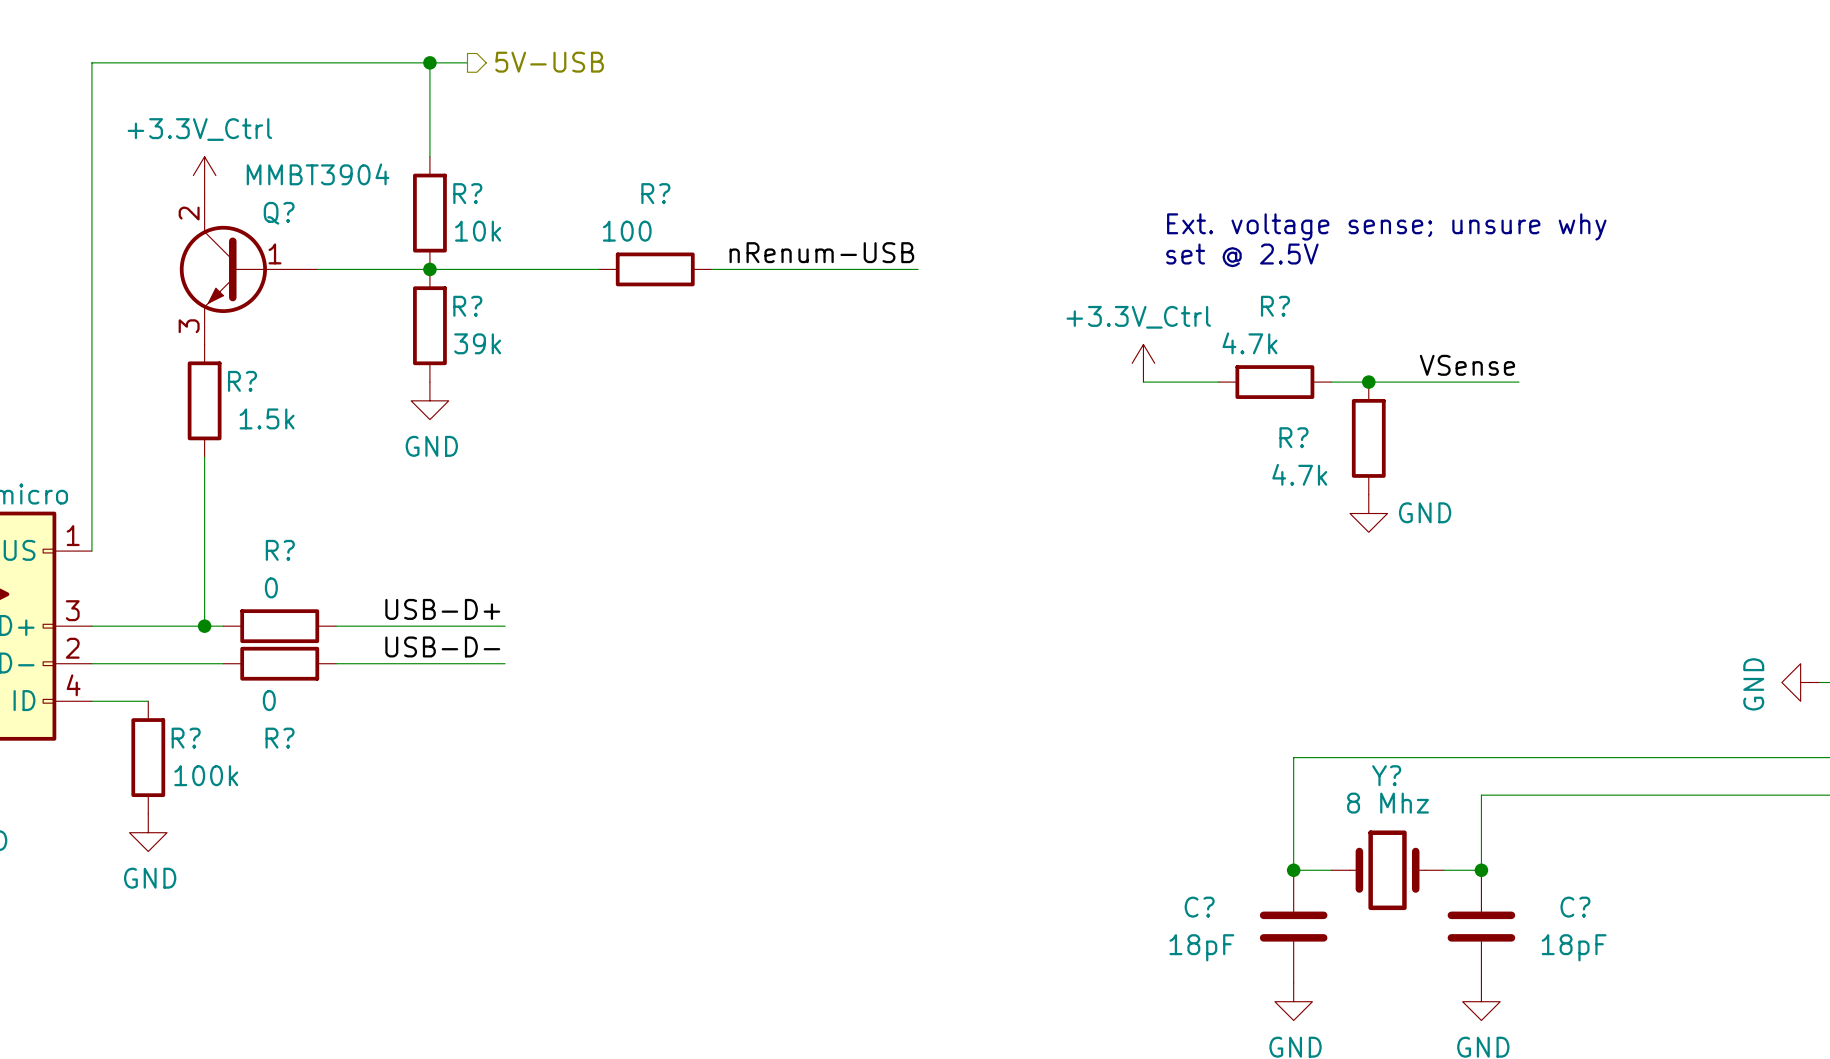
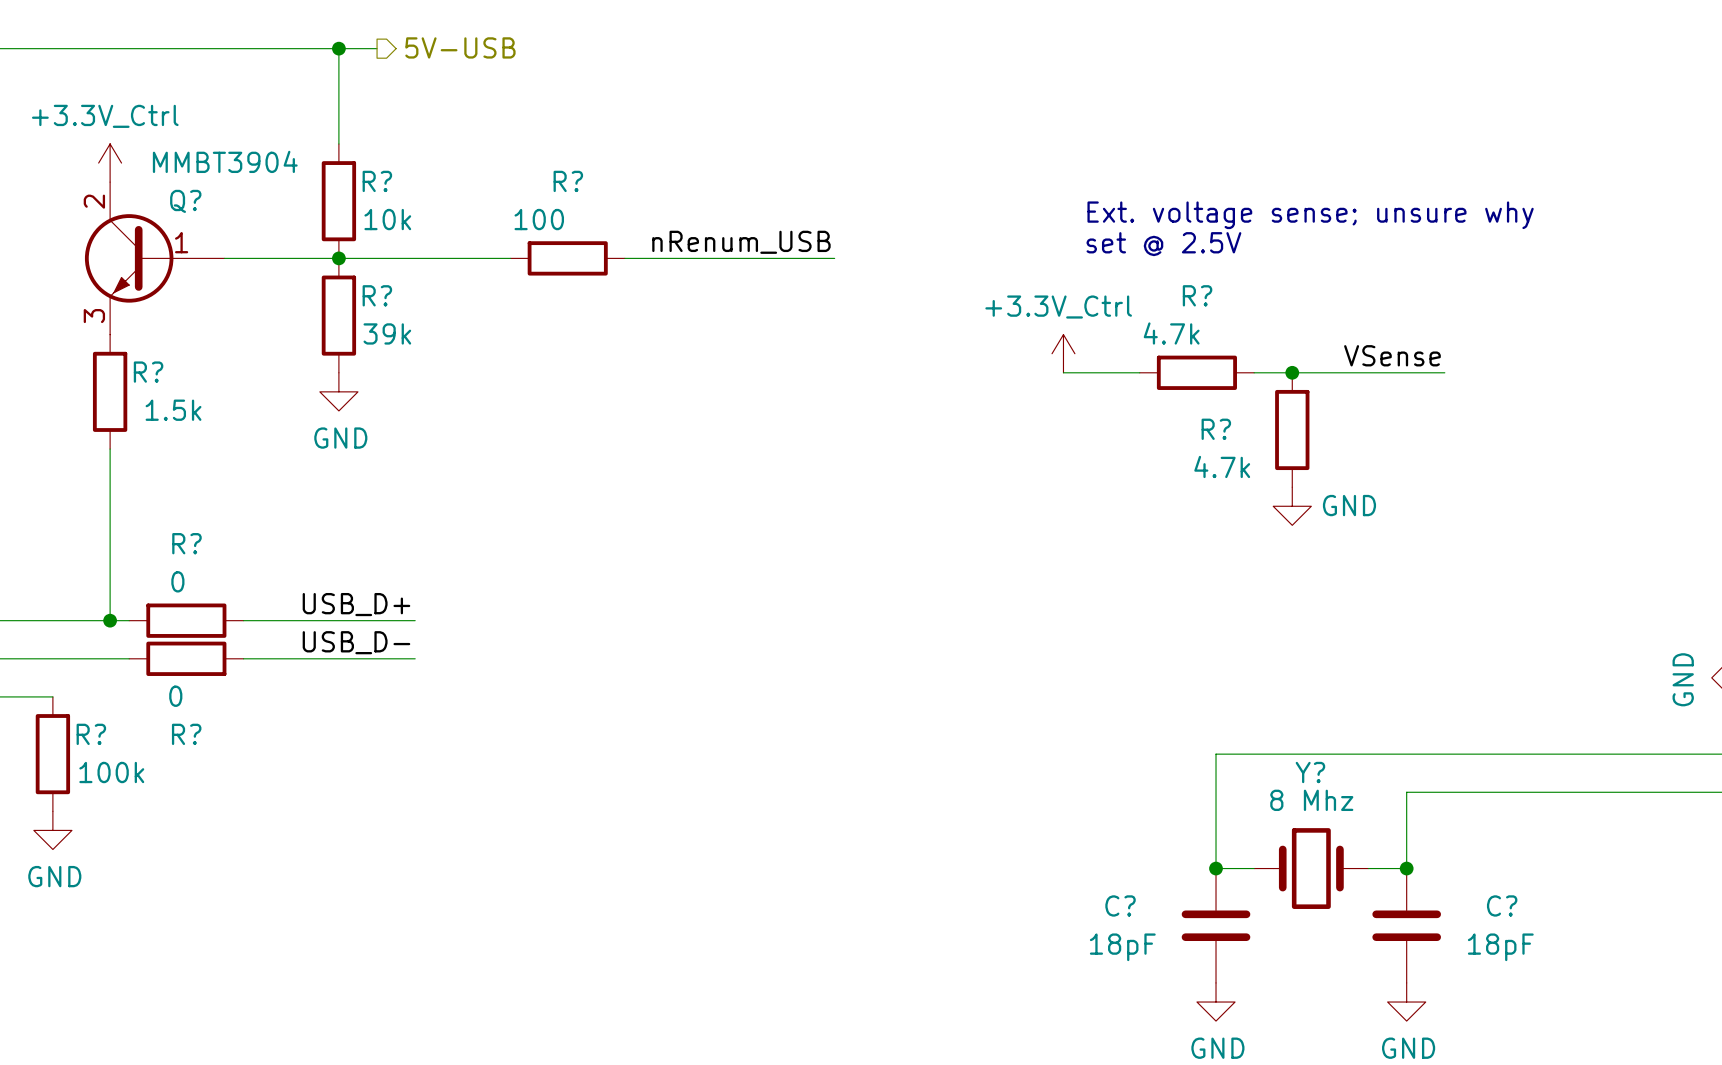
label: nRenum-USB (821, 252) -> nRenum_USB (741, 242)
label: USB-D+ (442, 609) -> USB_D+ (356, 604)
label: USB-D- (442, 646) -> USB_D- (356, 642)

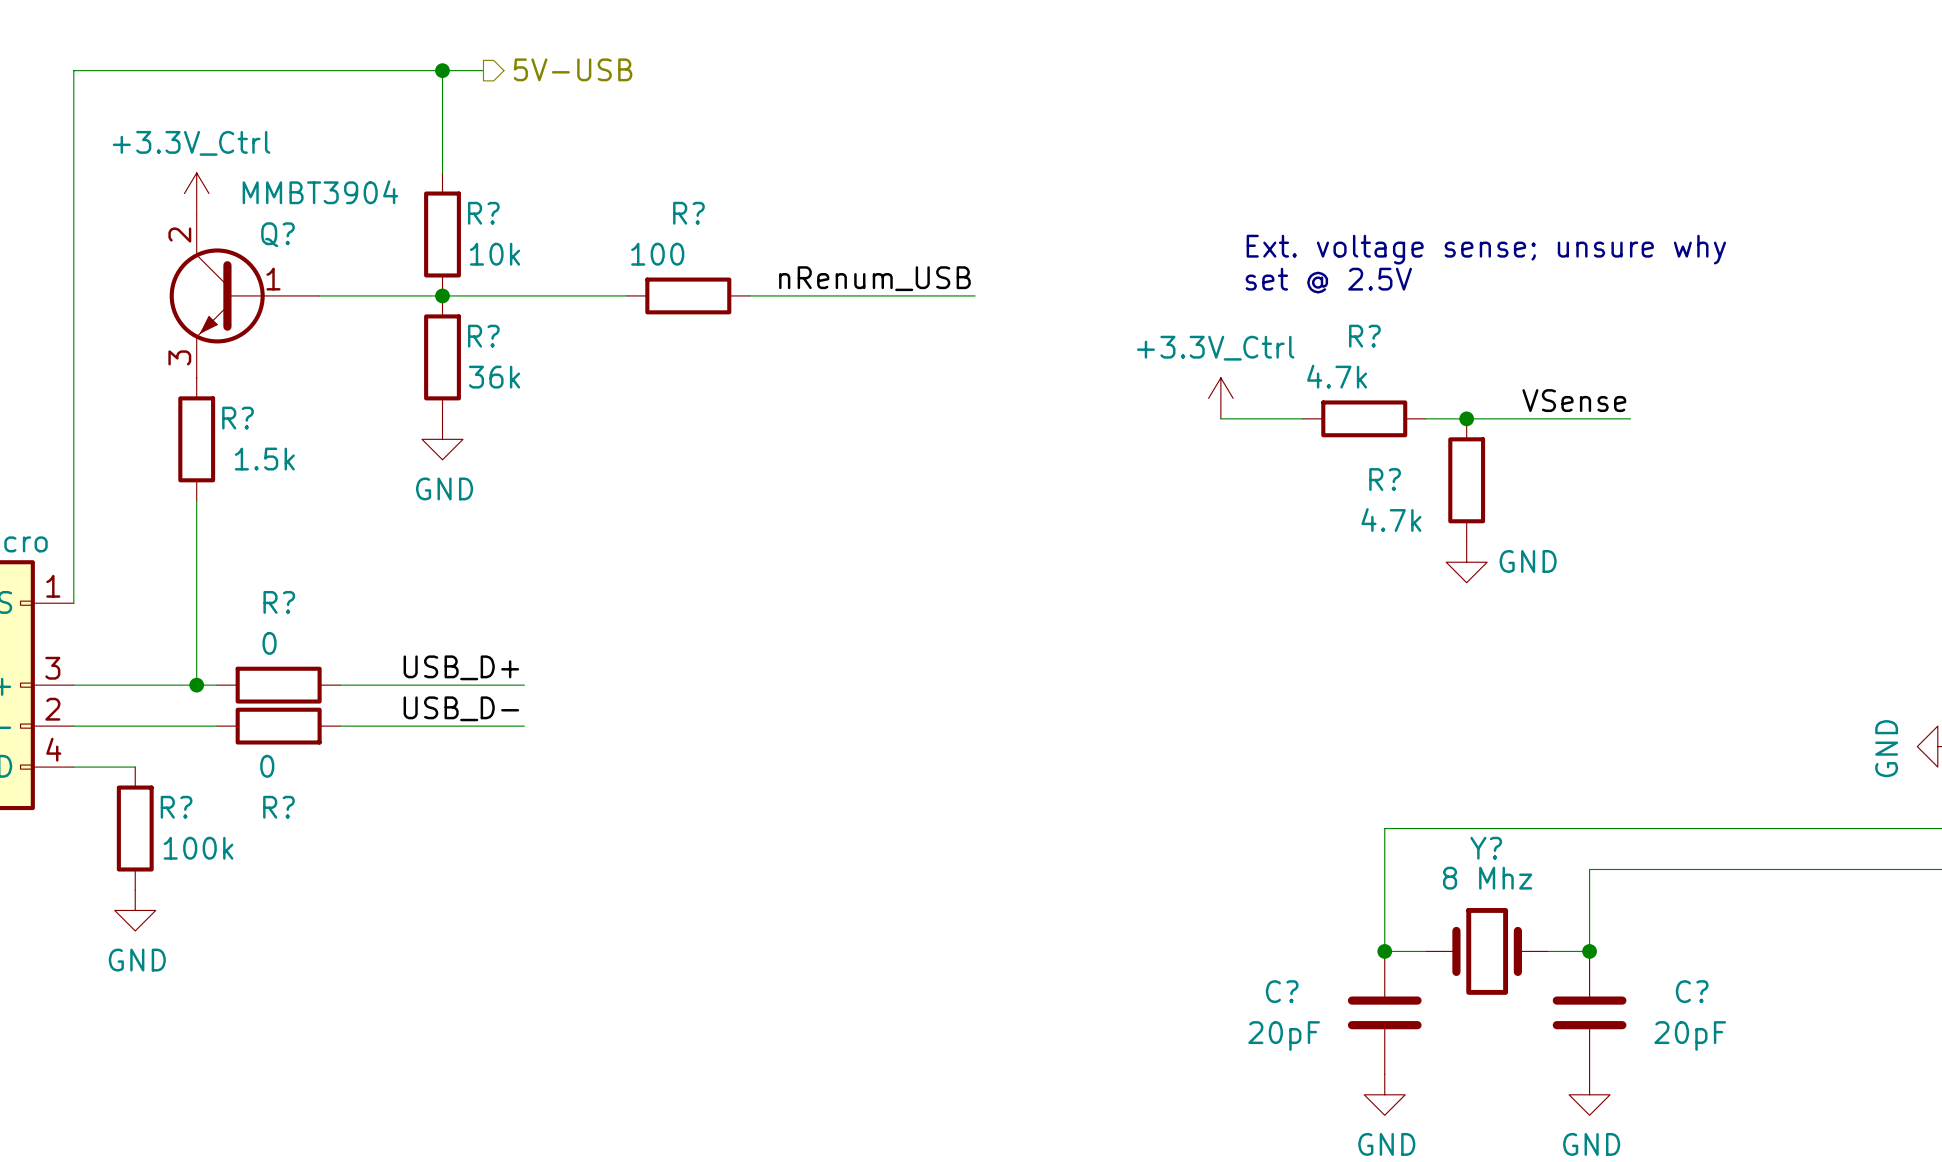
R? value: 39k (387, 333) -> 36k (494, 377)
C? value: 18pF (1122, 947) -> 20pF (1284, 1036)
C? value: 18pF (1500, 947) -> 20pF (1690, 1036)

